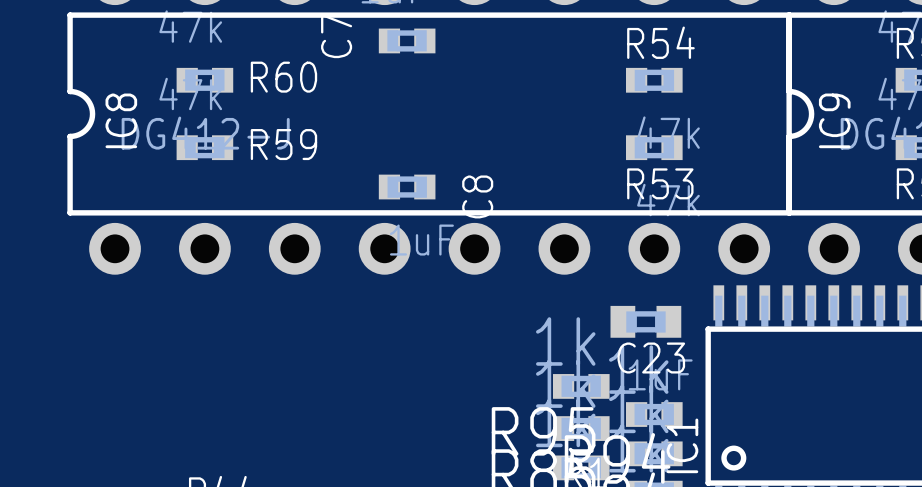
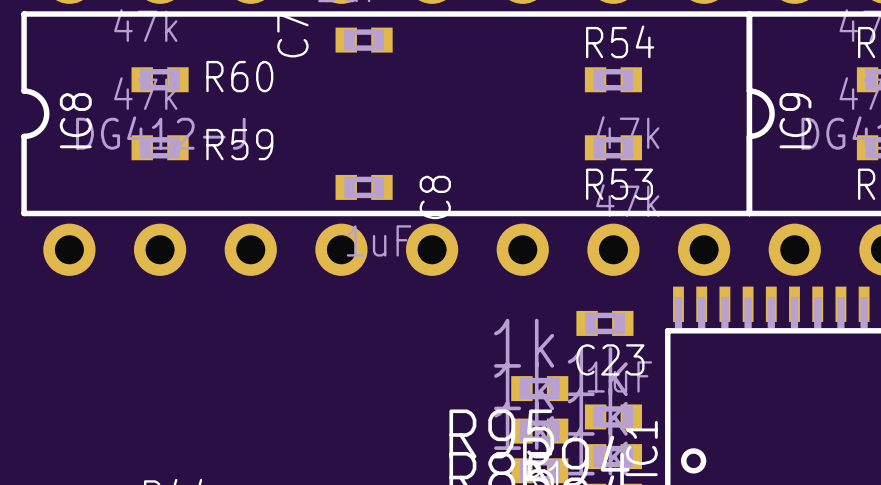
C23 footprint: [610, 305, 682, 338] -> [576, 310, 634, 336]

